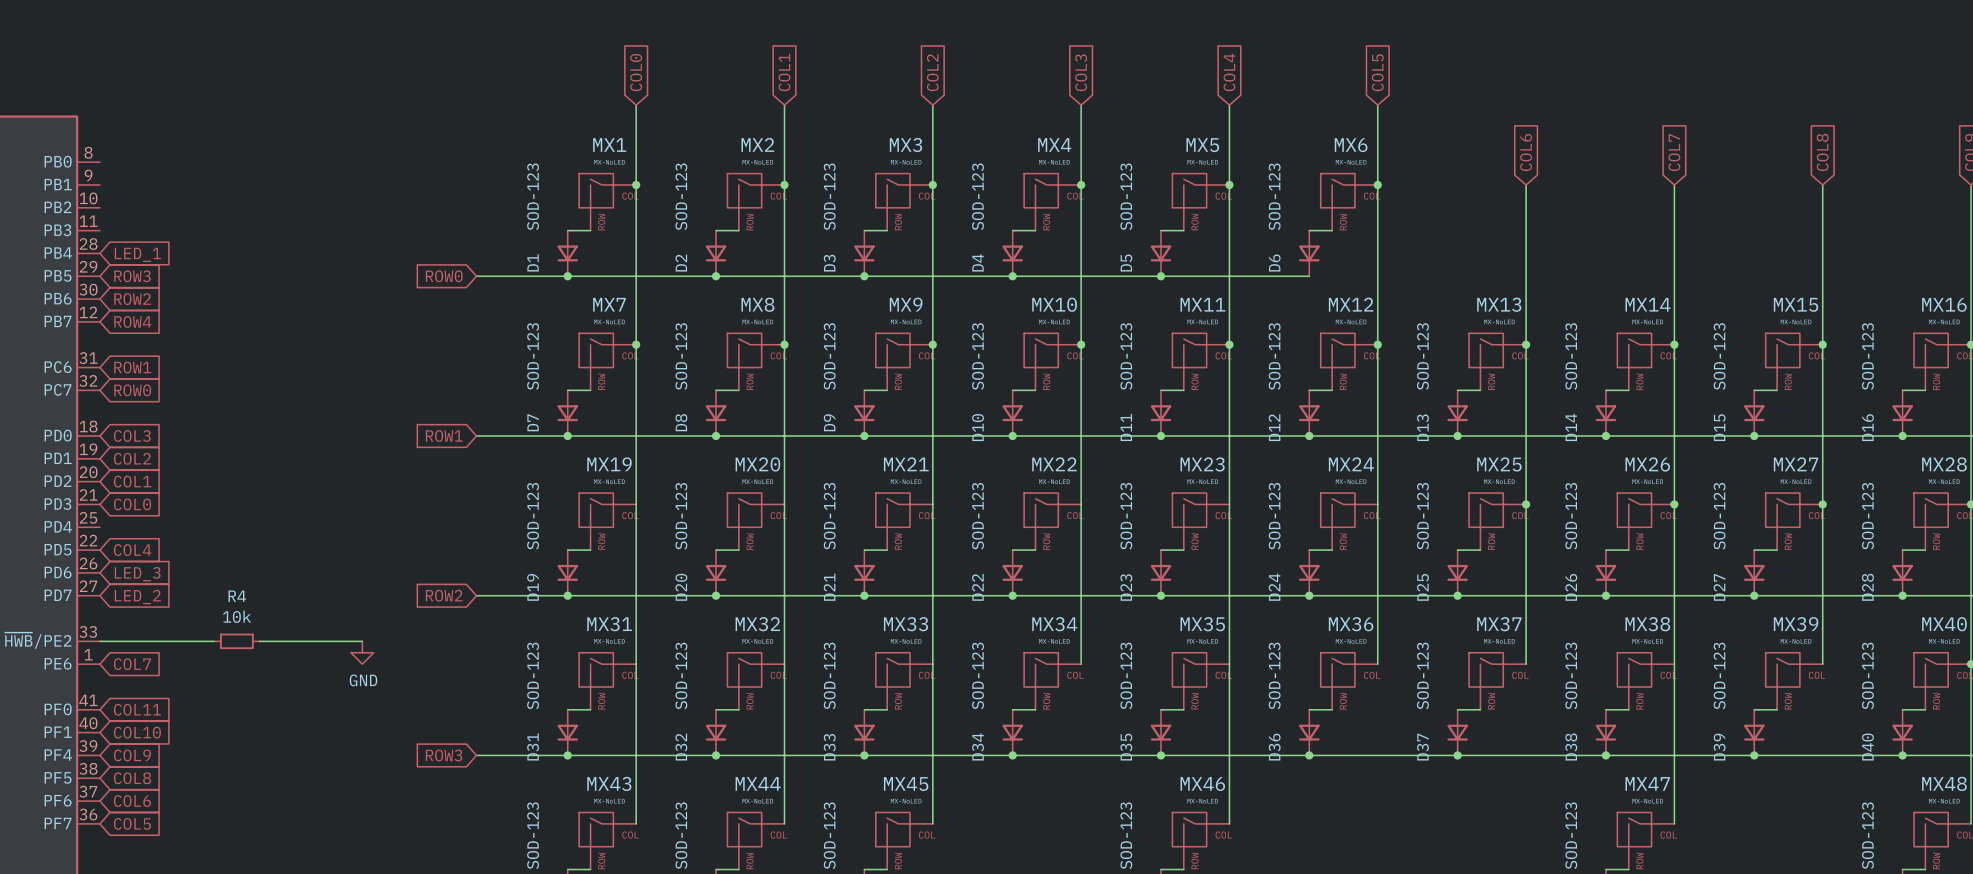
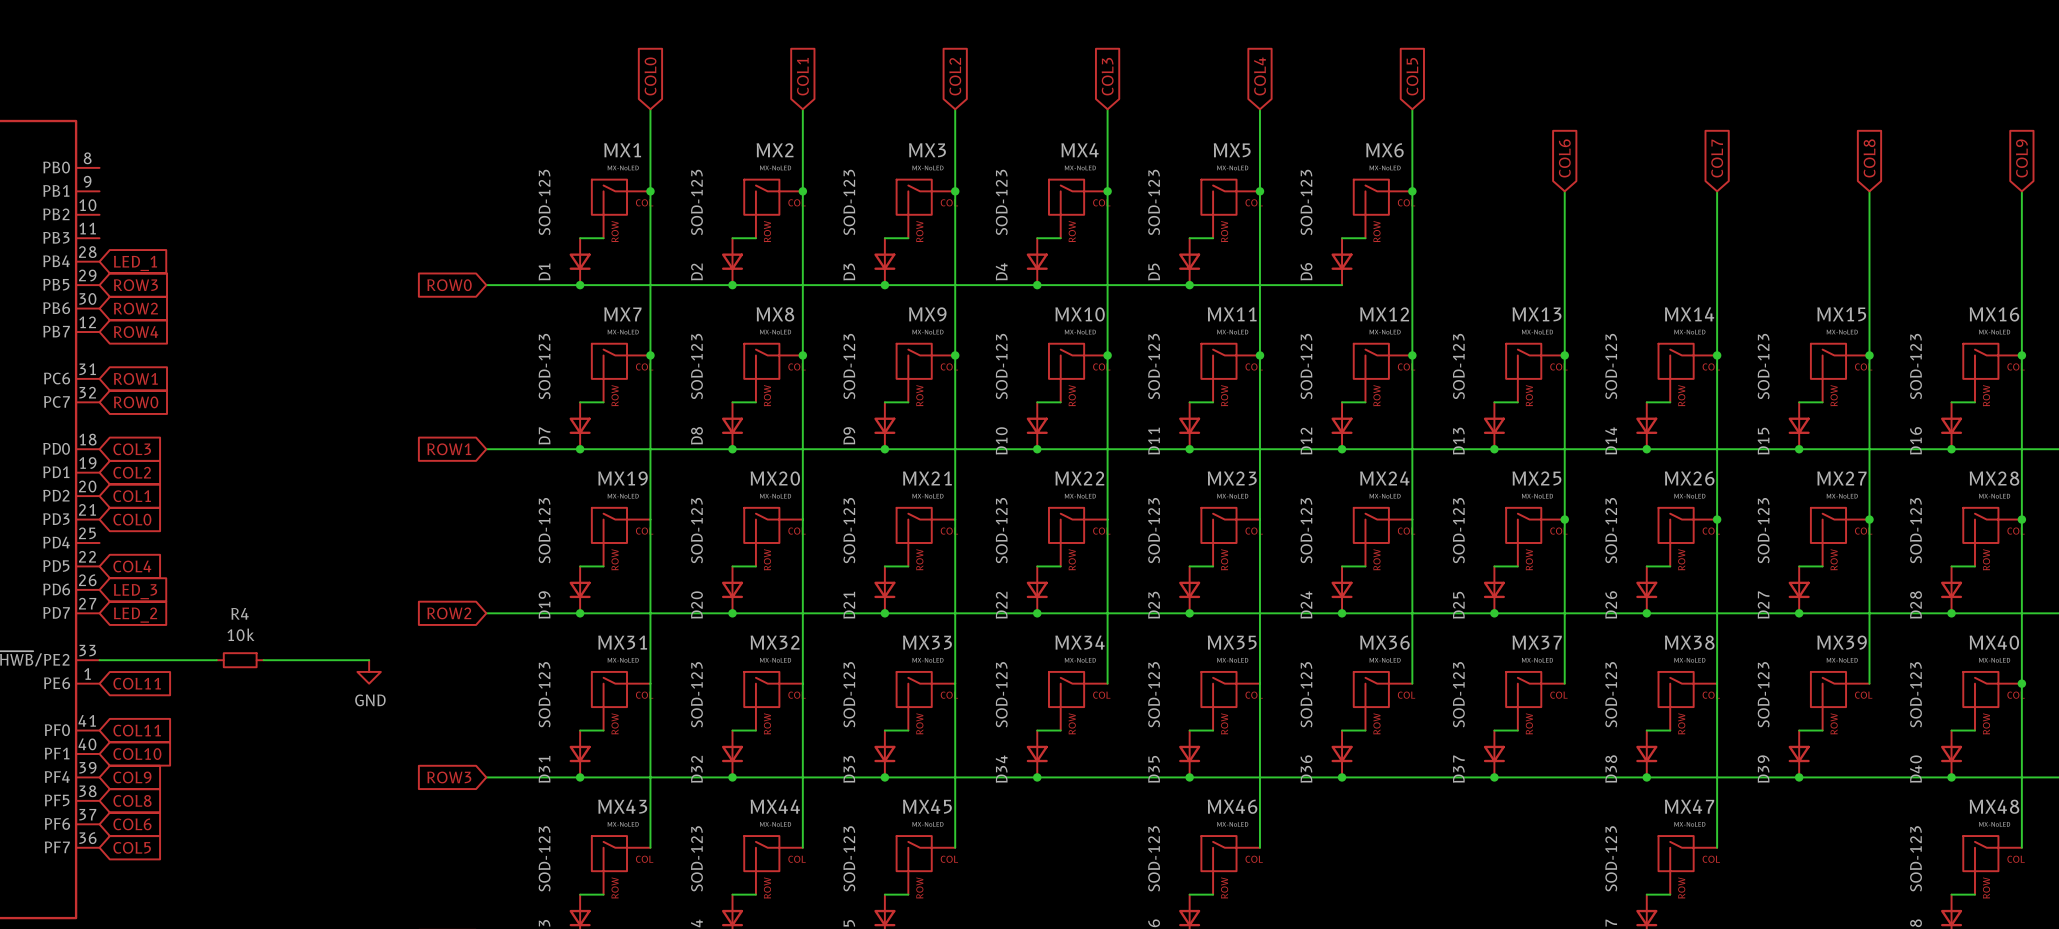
global label: COL7 (132, 664) -> COL11 (137, 683)

